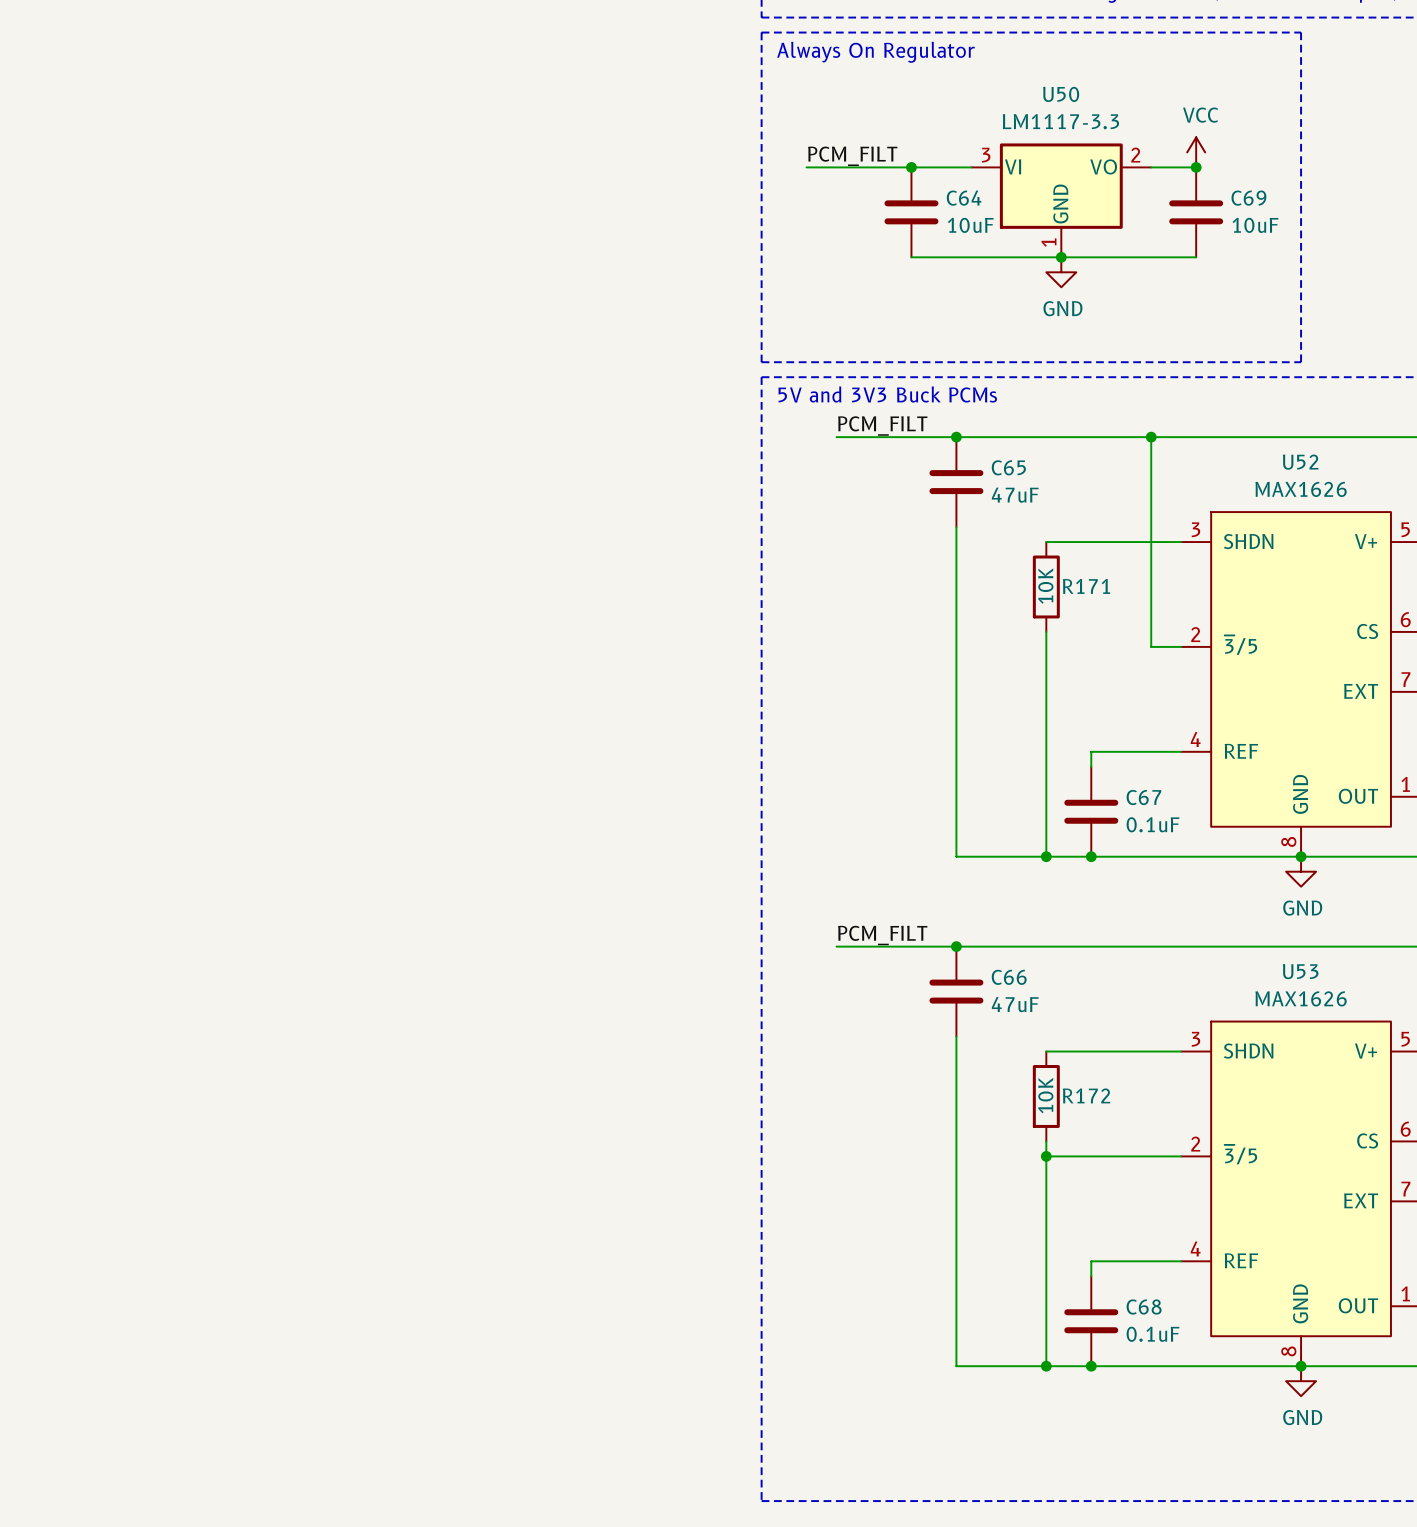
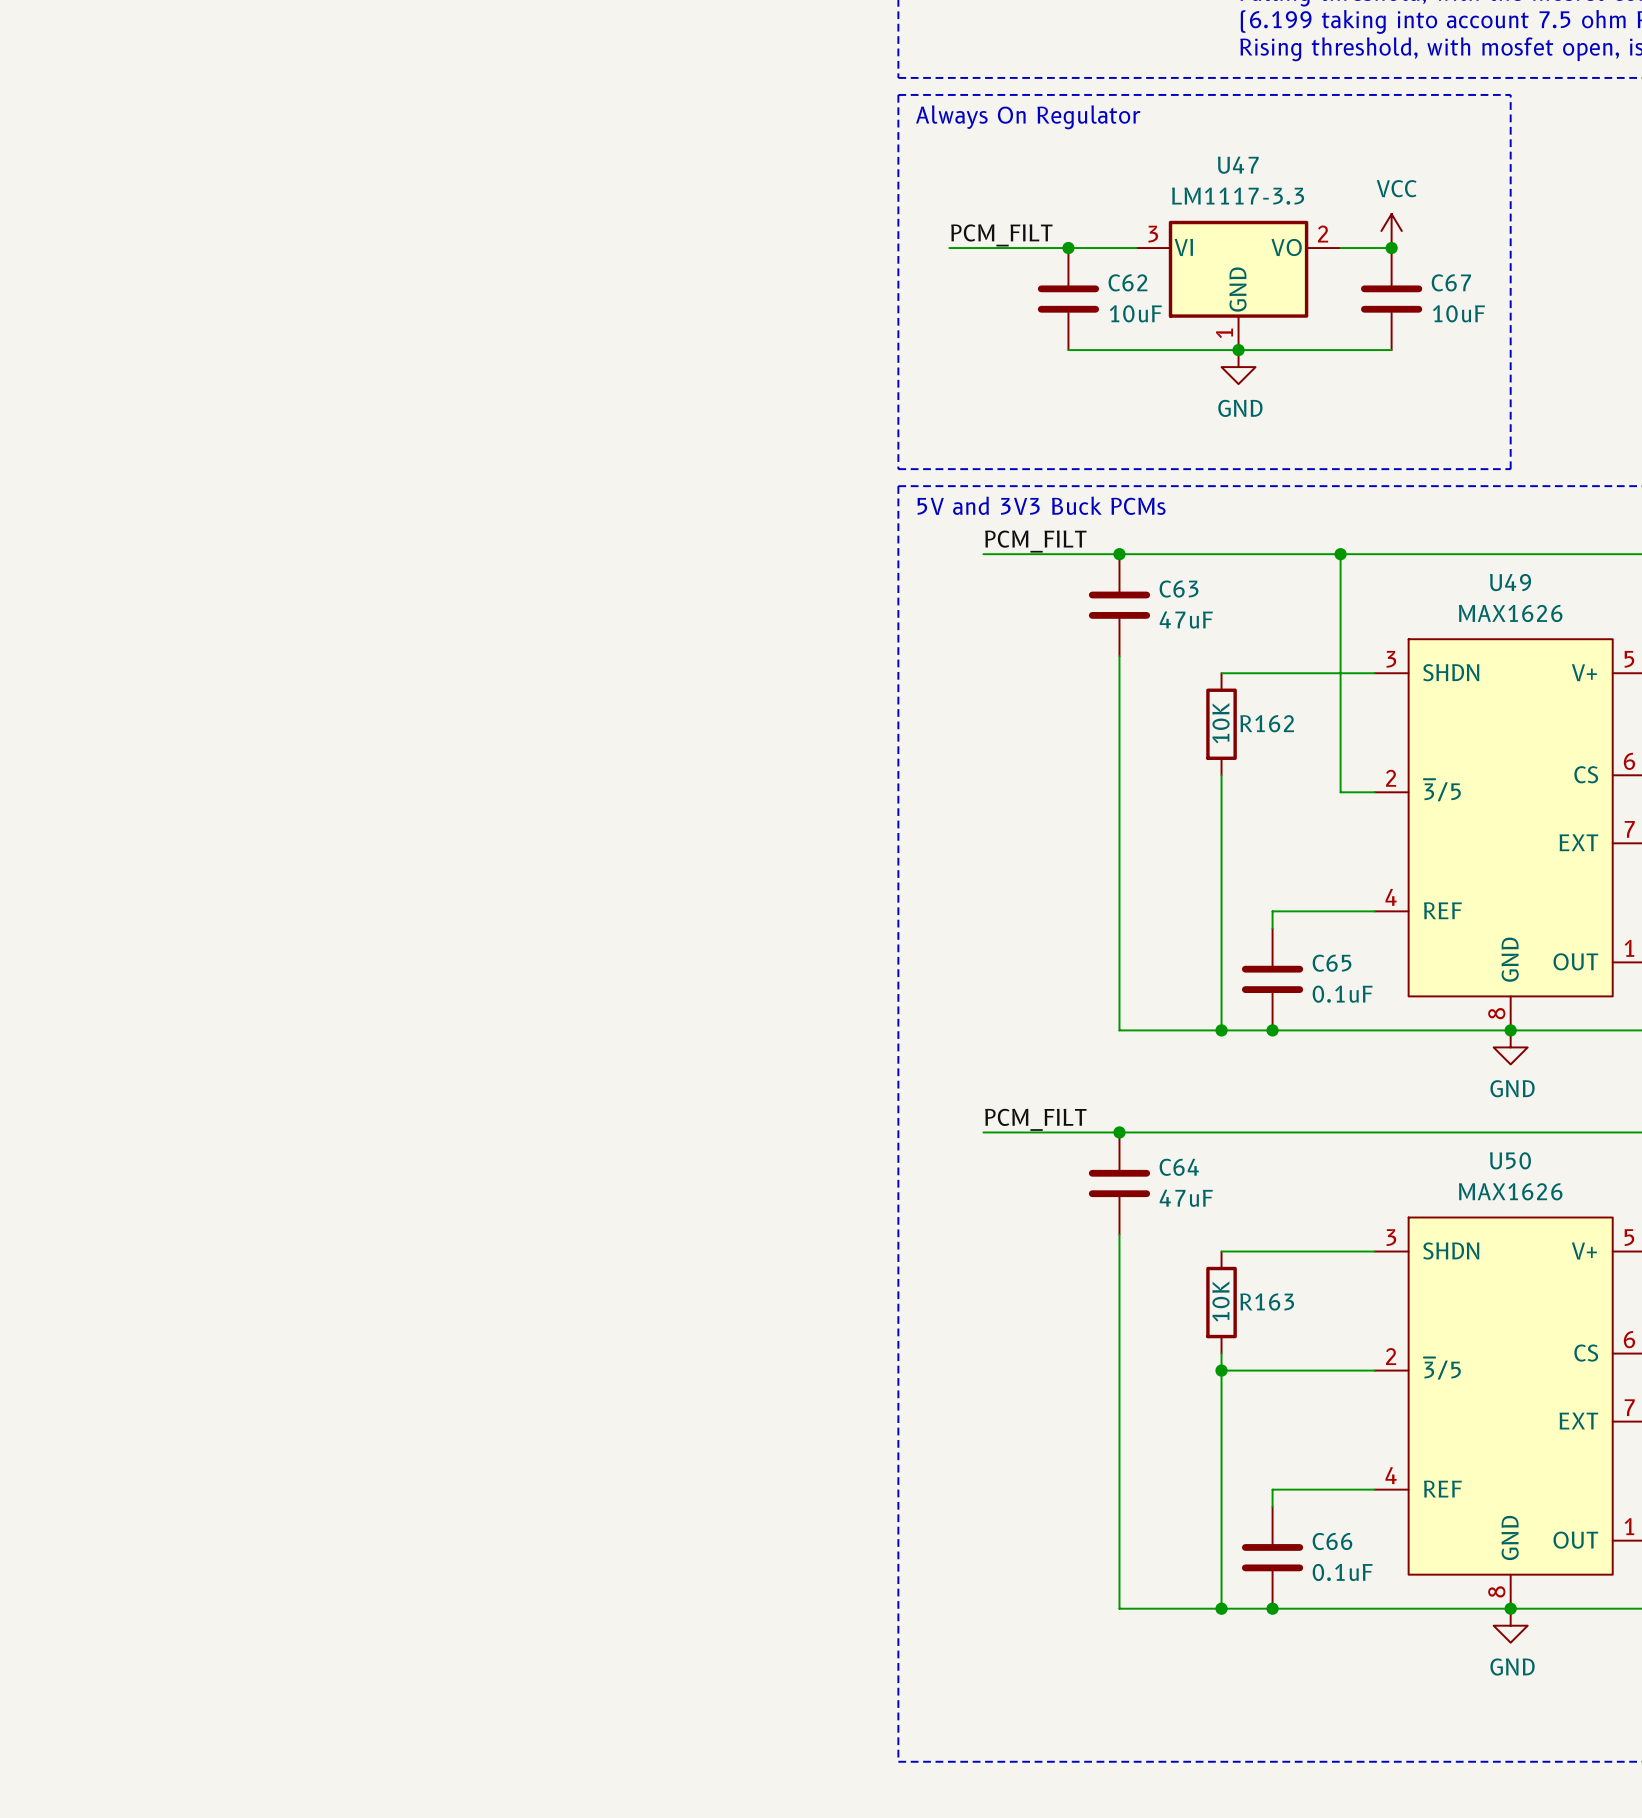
U50 name: U50 (1061, 94) -> U47 (1238, 165)
C64 name: C64 (964, 198) -> C62 (1127, 282)
C69 name: C69 (1248, 198) -> C67 (1451, 282)
U52 name: U52 (1300, 462) -> U49 (1510, 582)
C65 name: C65 (1008, 467) -> C63 (1179, 589)
R171 name: R171 (1086, 586) -> R162 (1267, 723)
C67 name: C67 (1143, 797) -> C65 (1332, 963)
U53 name: U53 (1300, 971) -> U50 (1510, 1160)
C66 name: C66 (1009, 977) -> C64 (1179, 1167)
R172 name: R172 (1086, 1095) -> R163 (1267, 1302)
C68 name: C68 (1144, 1307) -> C66 (1332, 1541)

